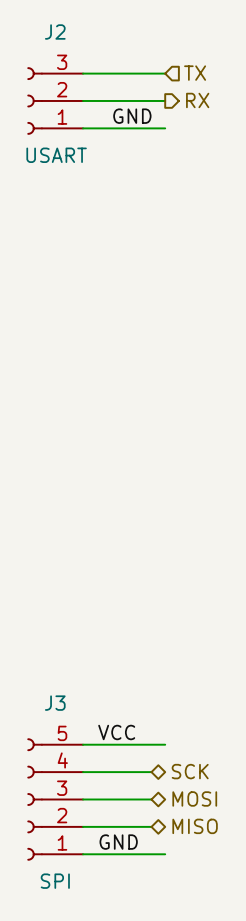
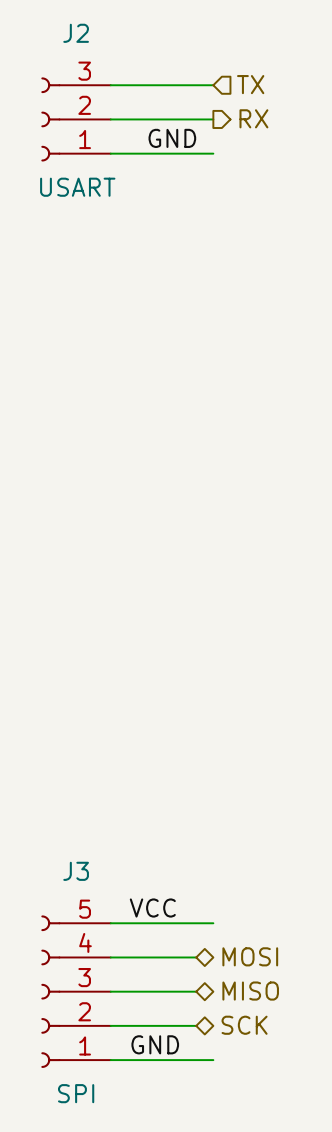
hierarchical label: SCK (190, 771) -> MOSI (250, 956)
hierarchical label: MOSI (194, 798) -> MISO (250, 991)
hierarchical label: MISO (195, 826) -> SCK (244, 1025)

